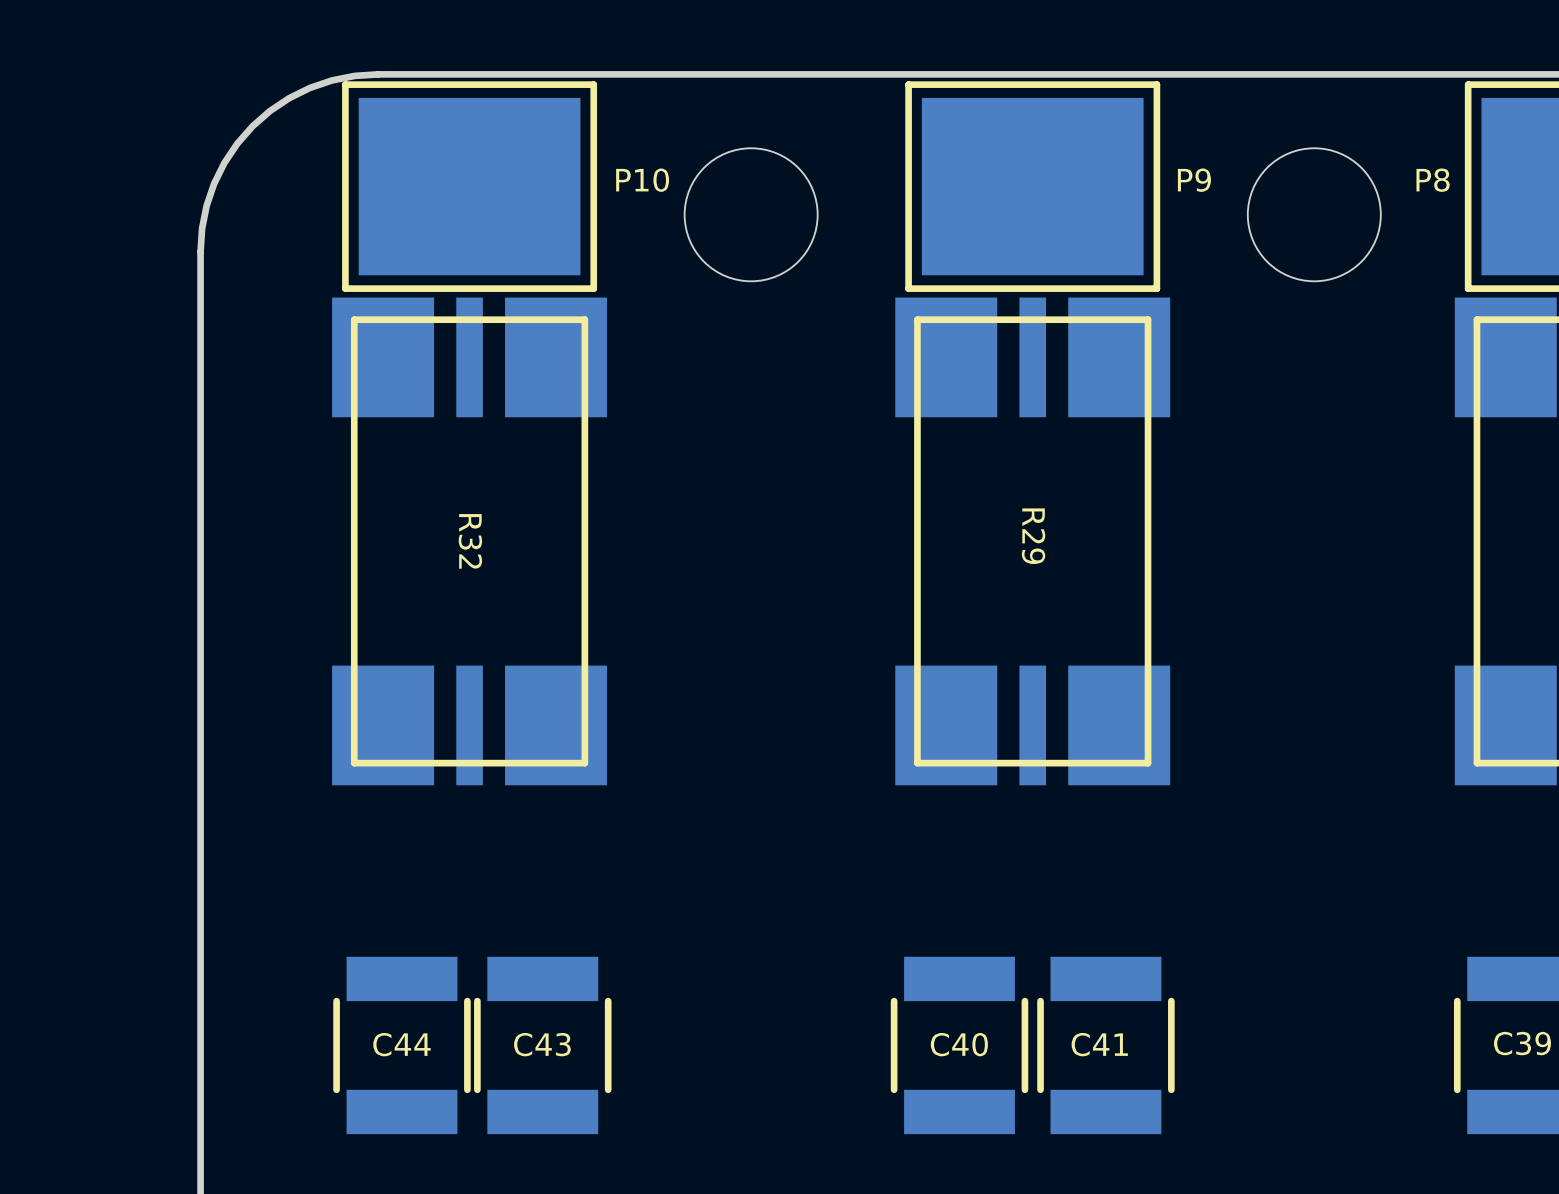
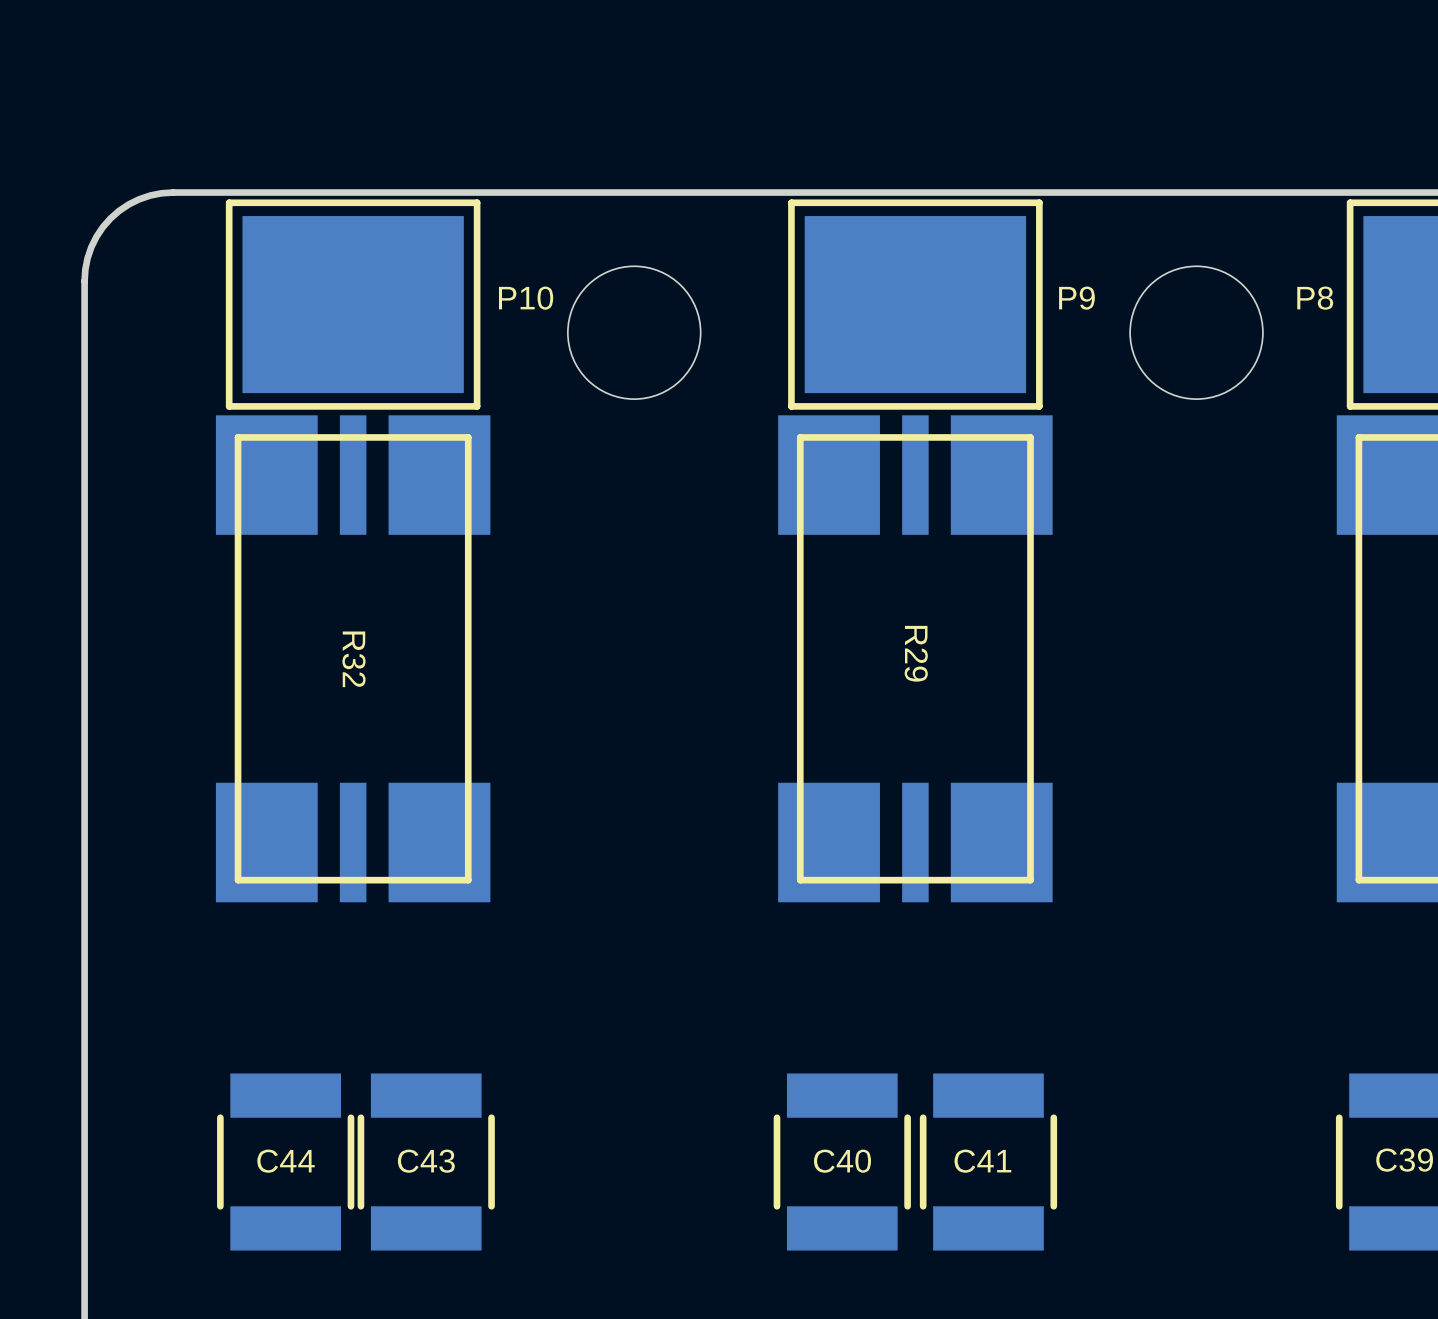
board edge: (377, 74) (354, 75) (332, 80) (310, 87) (289, 98) (269, 111) (252, 126) (237, 143) (224, 163) (214, 183) (206, 205) (202, 228) (200, 251) -> (261, 192) (161, 193) (150, 195) (128, 204) (110, 218) (102, 227) (91, 247) (85, 269) (84, 369)

